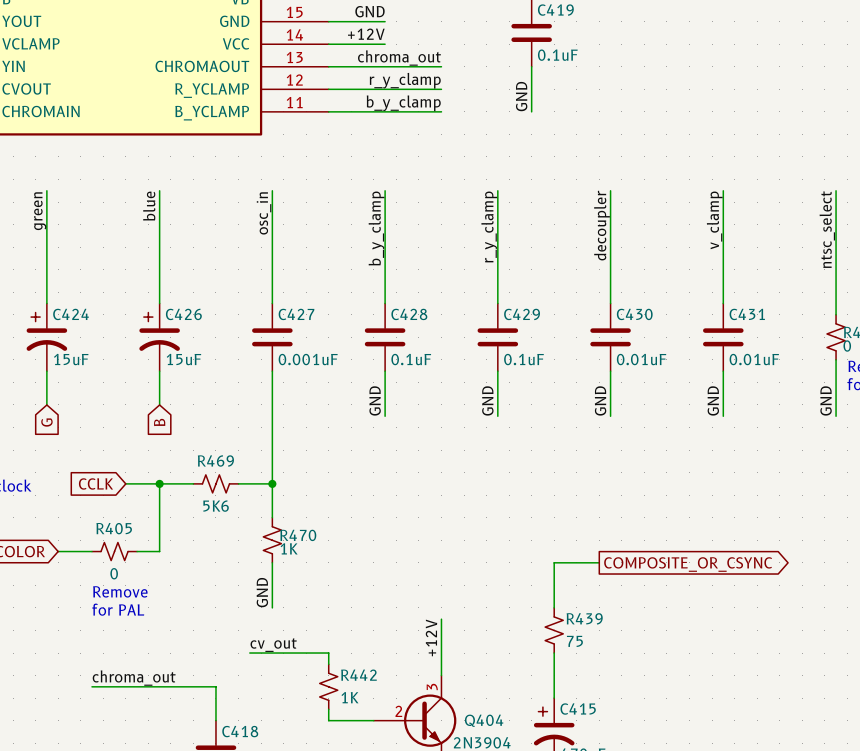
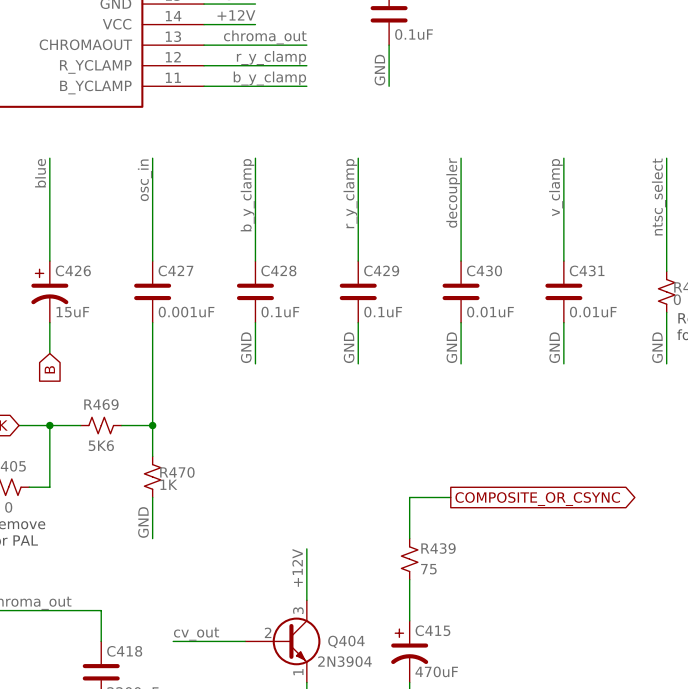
label position: cv_out (273, 645) -> cv_out (196, 634)
wire: (249, 653) (328, 653) (328, 664) -> none
R442: 1K (328, 686) -> none
wire: (328, 709) (328, 720) -> (173, 641) (204, 641)

